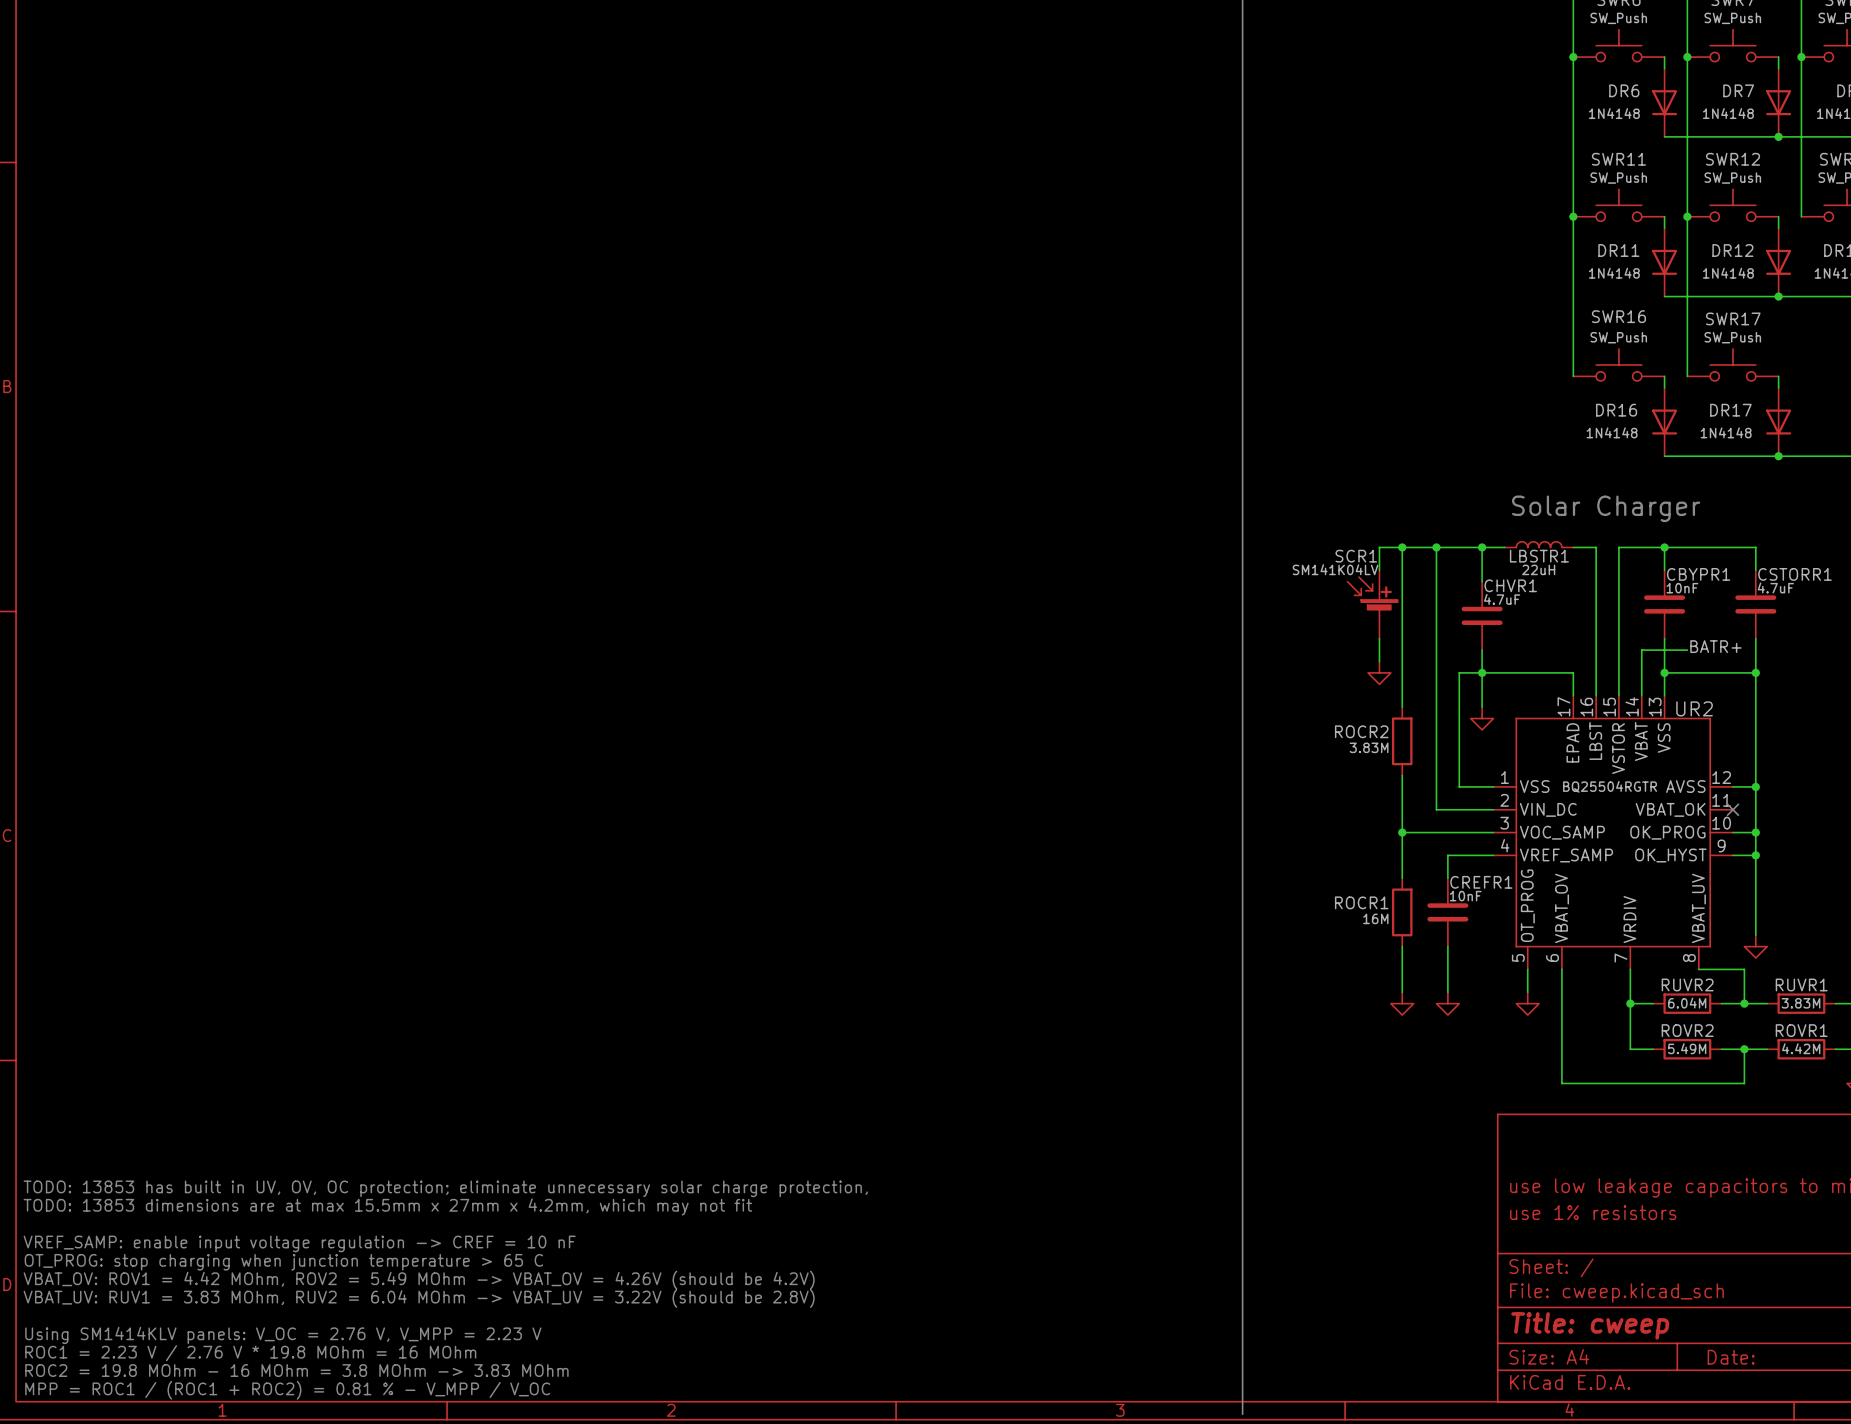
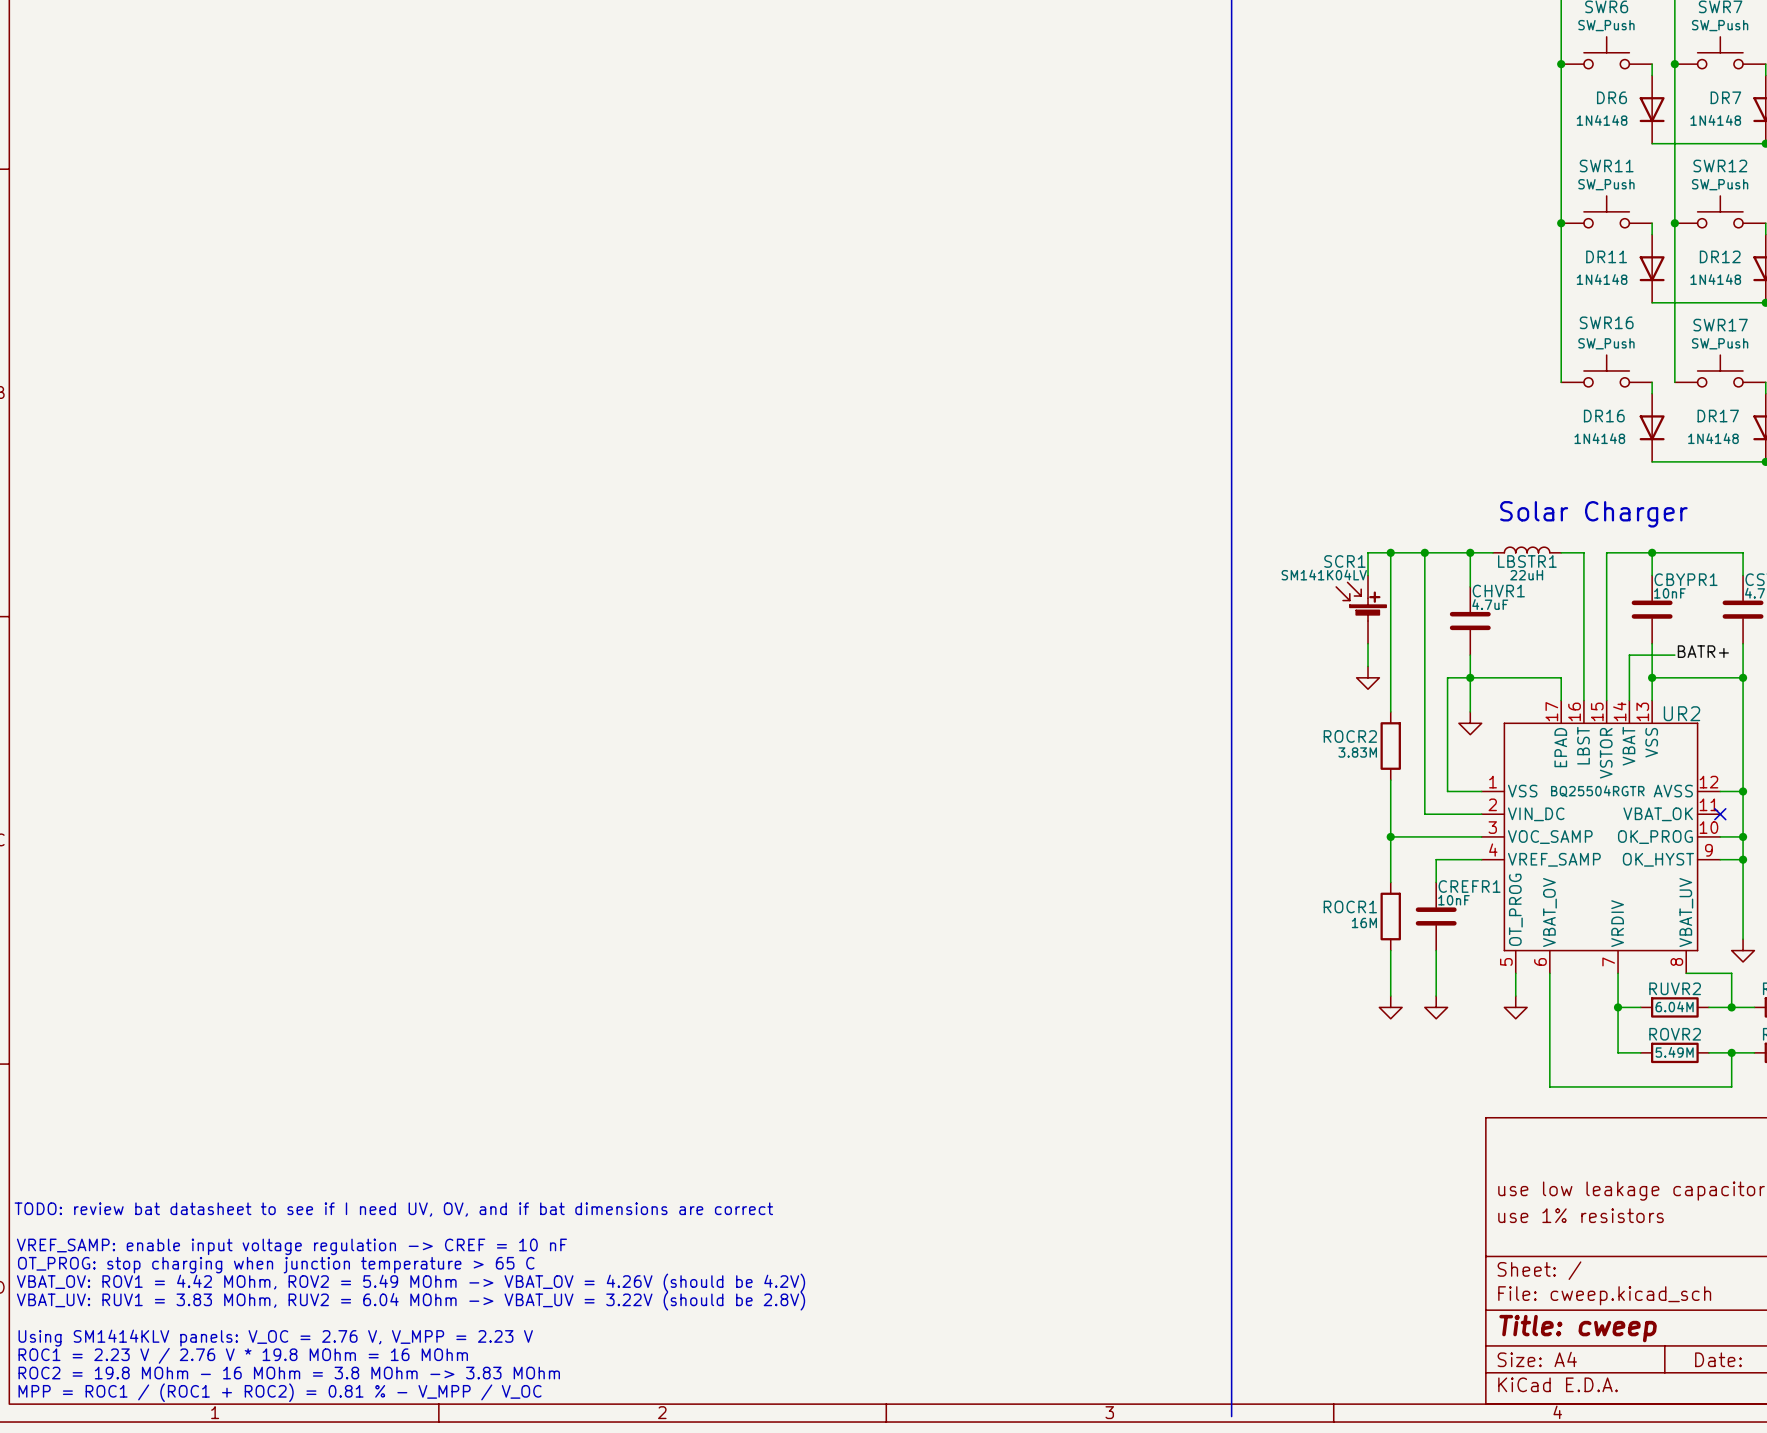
text: TODO: 13853 has built in UV, OV, OC protection; eliminate unnecessary solar charge protection, (445, 1188) -> none
text: TODO: 13853 dimensions are at max 15.5mm x 27mm x 4.2mm, which may not fit (387, 1206) -> none
text: none -> TODO: review bat datasheet to see if I need UV, OV, and if bat dimensions are correct (393, 1209)

